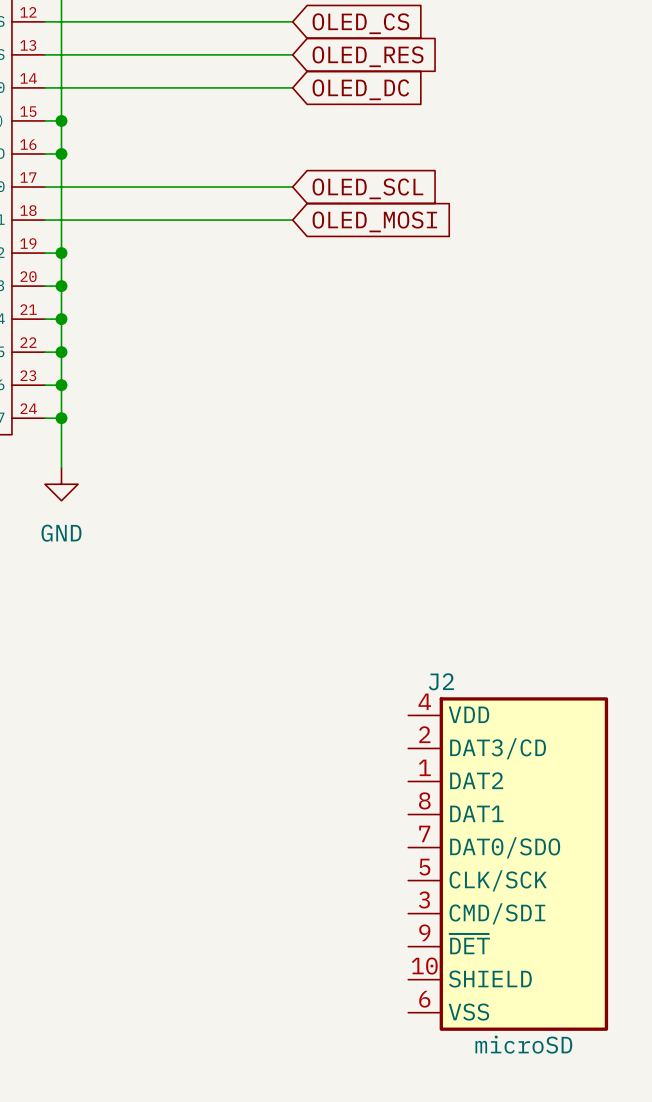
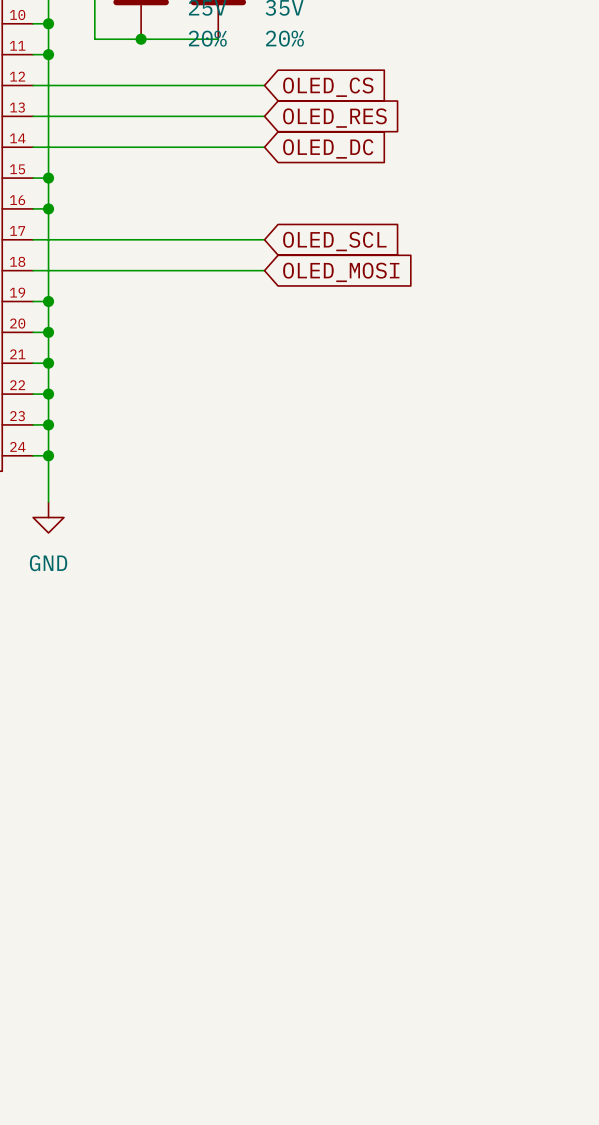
J2: microSD (508, 864) -> none

